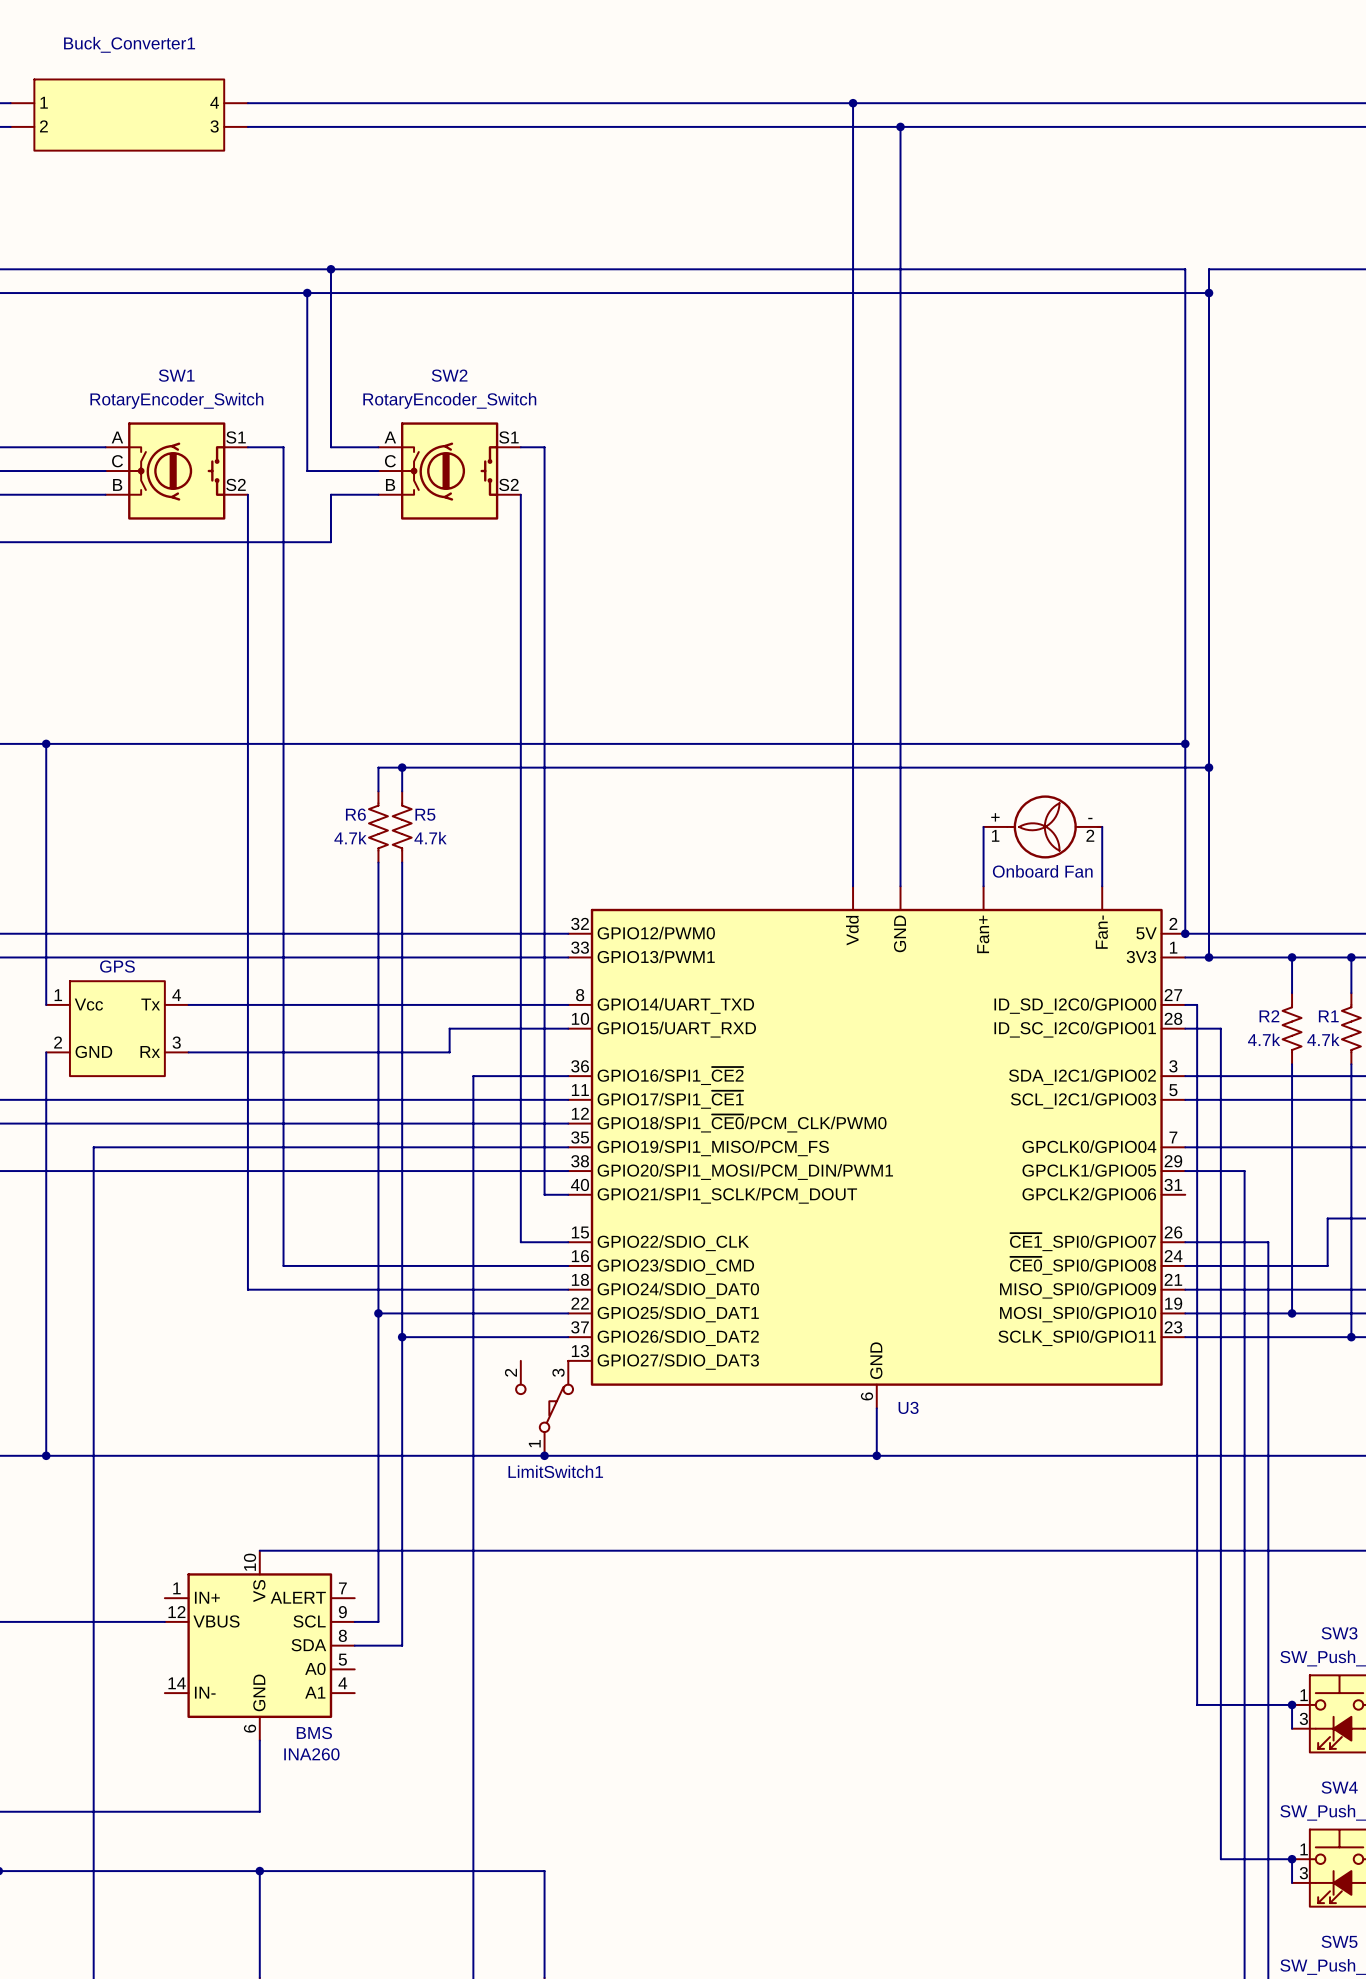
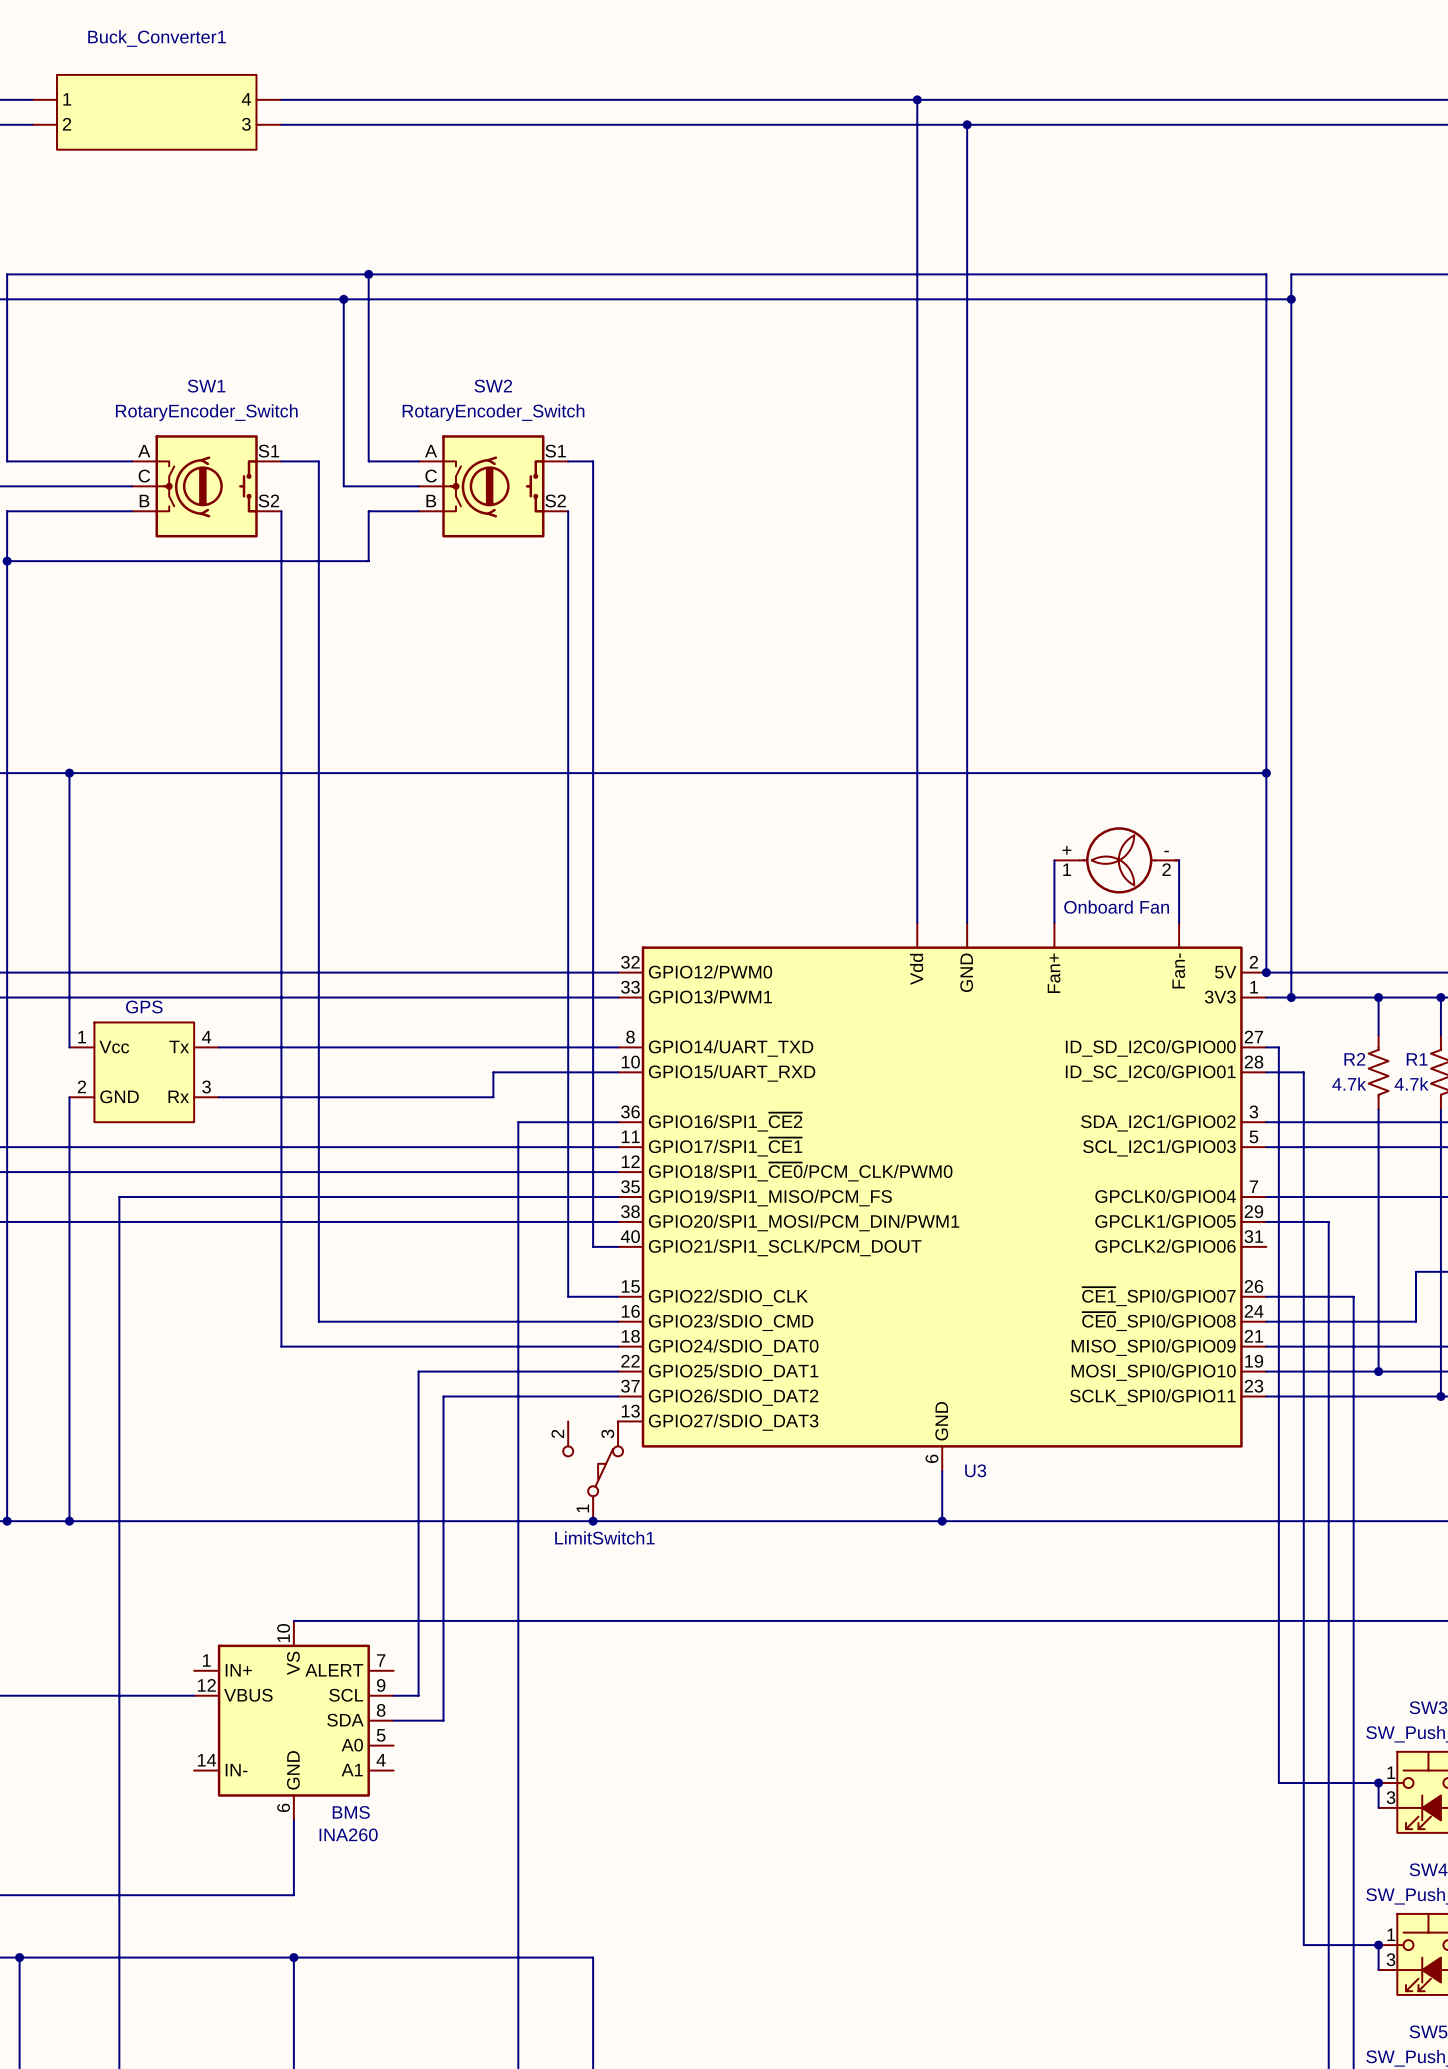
wire: (402, 767) (402, 791) -> none
junction: (402, 767) -> none
wire: (1209, 767) (378, 767) (378, 791) -> none
junction: (1209, 767) -> none
R6: 4.7k (378, 826) -> none
R5: 4.7k (402, 826) -> none
wire: (378, 862) (378, 1313) -> none
wire: (402, 862) (402, 1337) -> none
junction: (378, 1313) -> none
junction: (402, 1337) -> none

